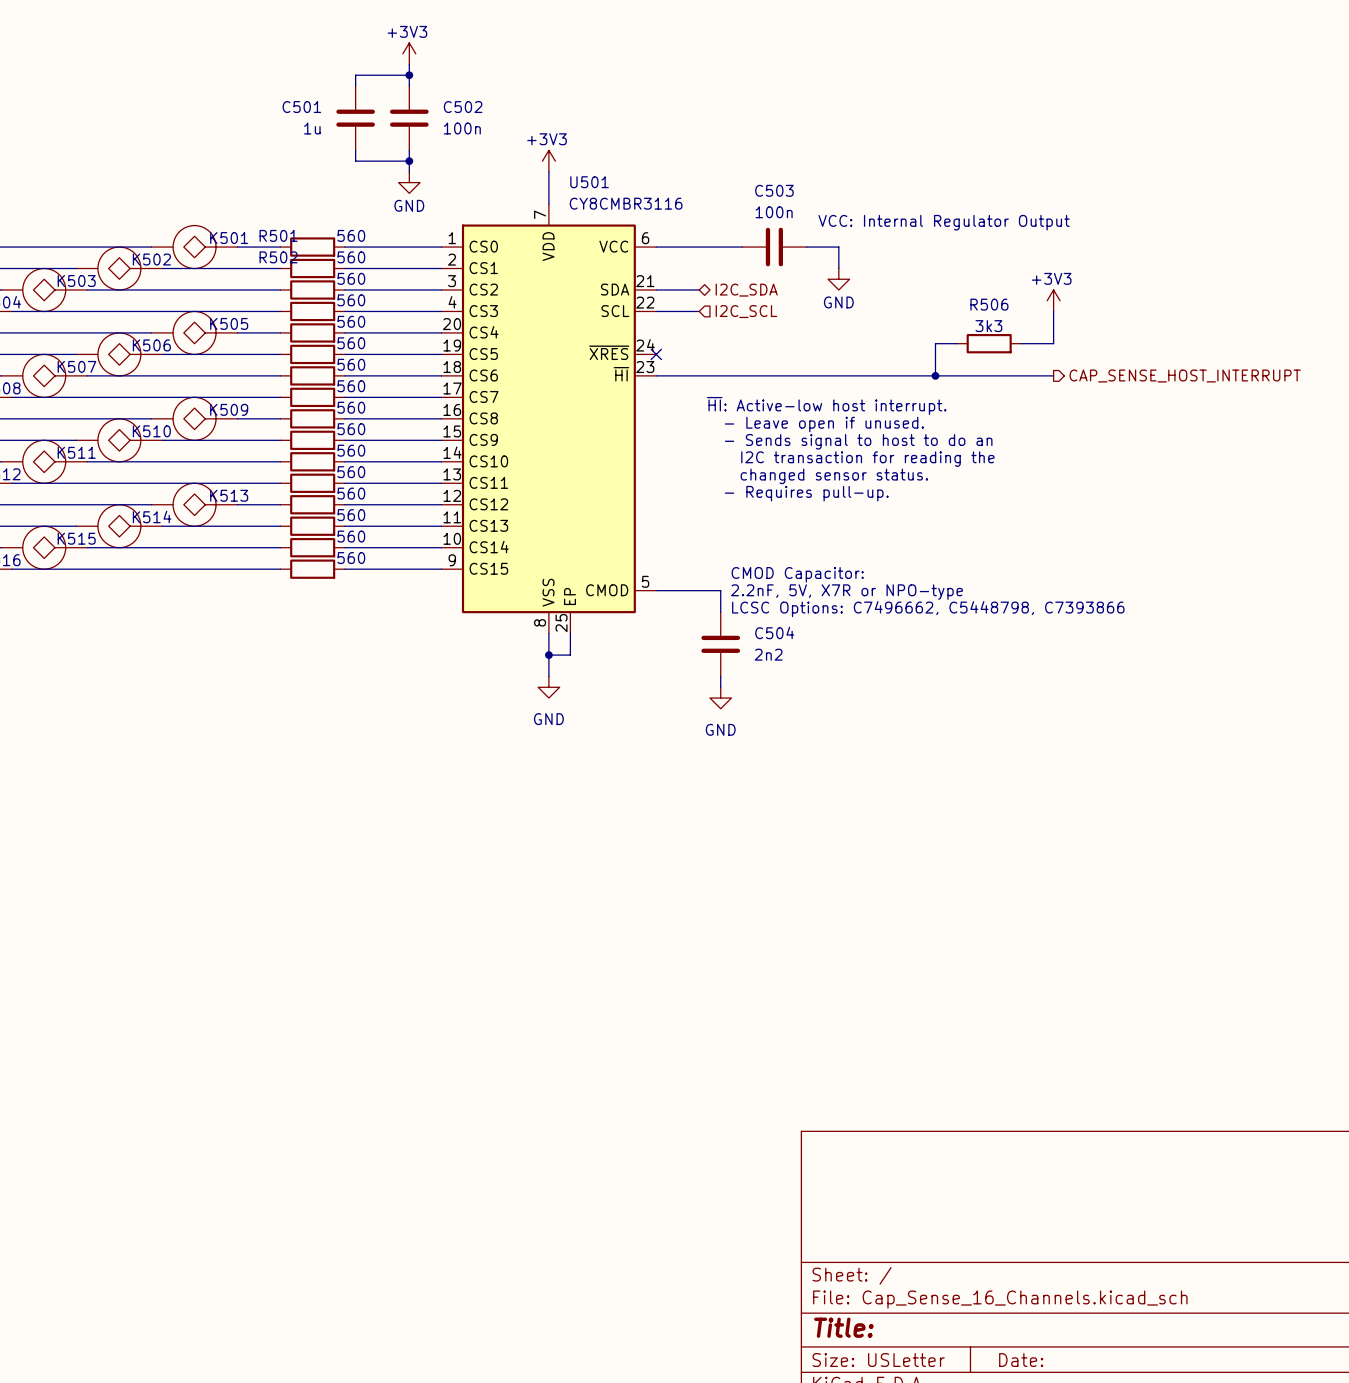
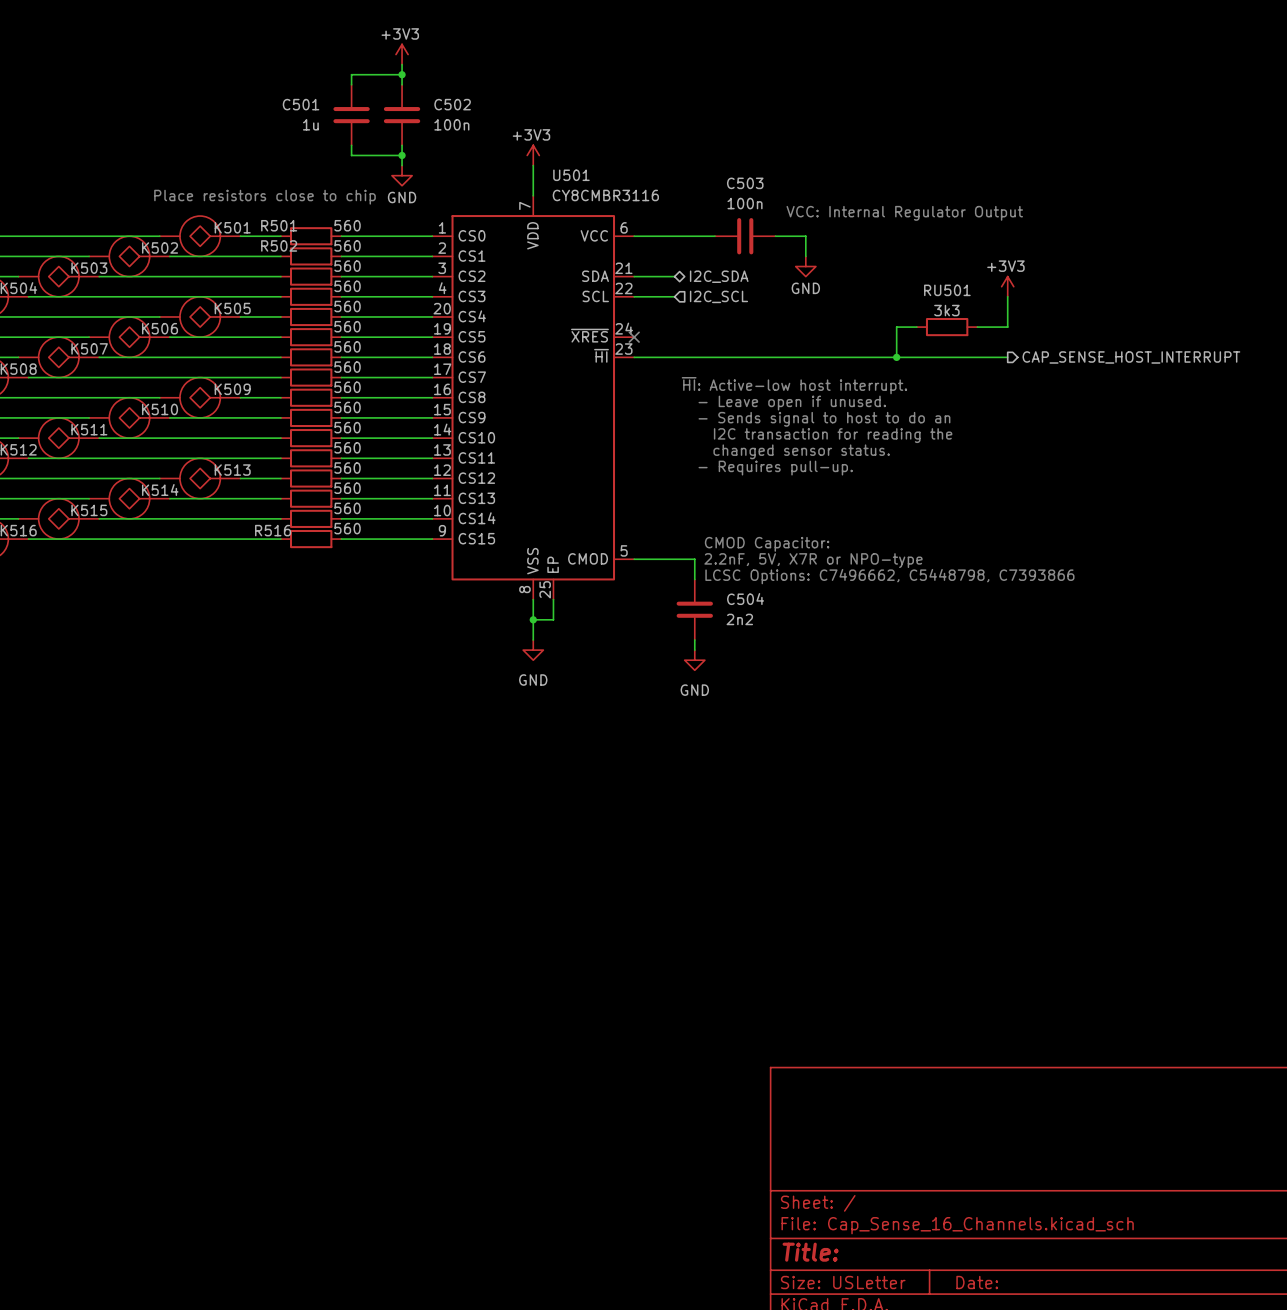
text: none -> Place resistors close to chip (265, 197)
R506 name: R506 (989, 304) -> RU501 (947, 290)
R516 name: none -> R516 (273, 530)

